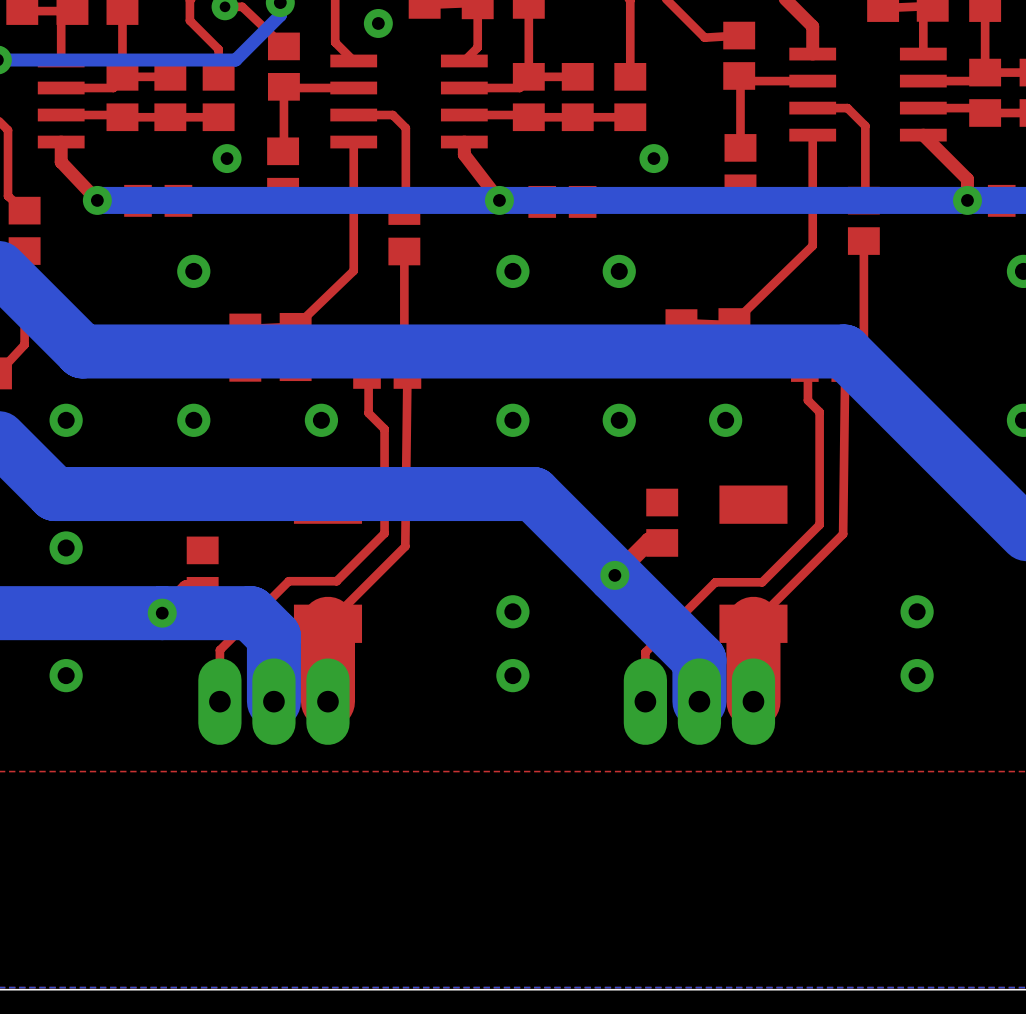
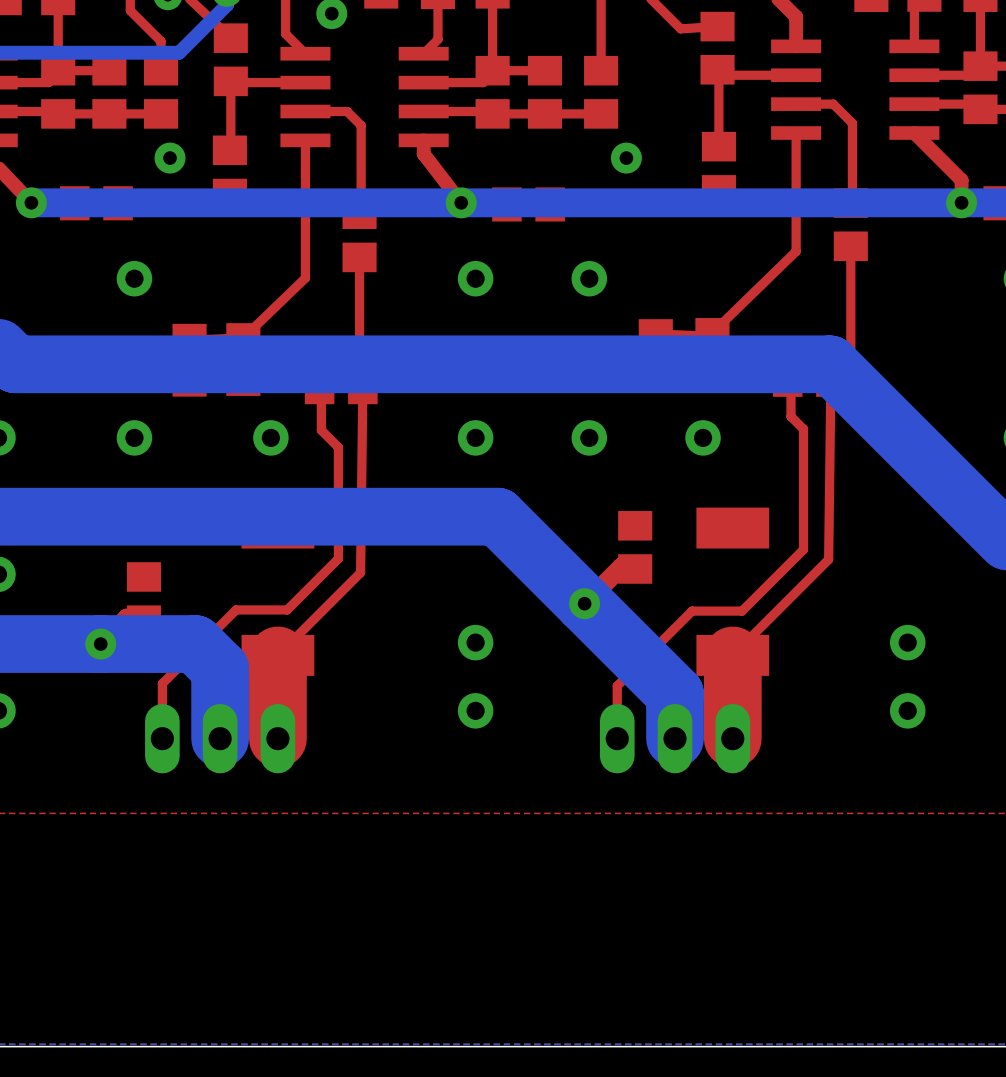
part footprint: [198, 658, 350, 745] -> [145, 704, 296, 774]
part footprint: [623, 658, 776, 745] -> [599, 704, 751, 774]

